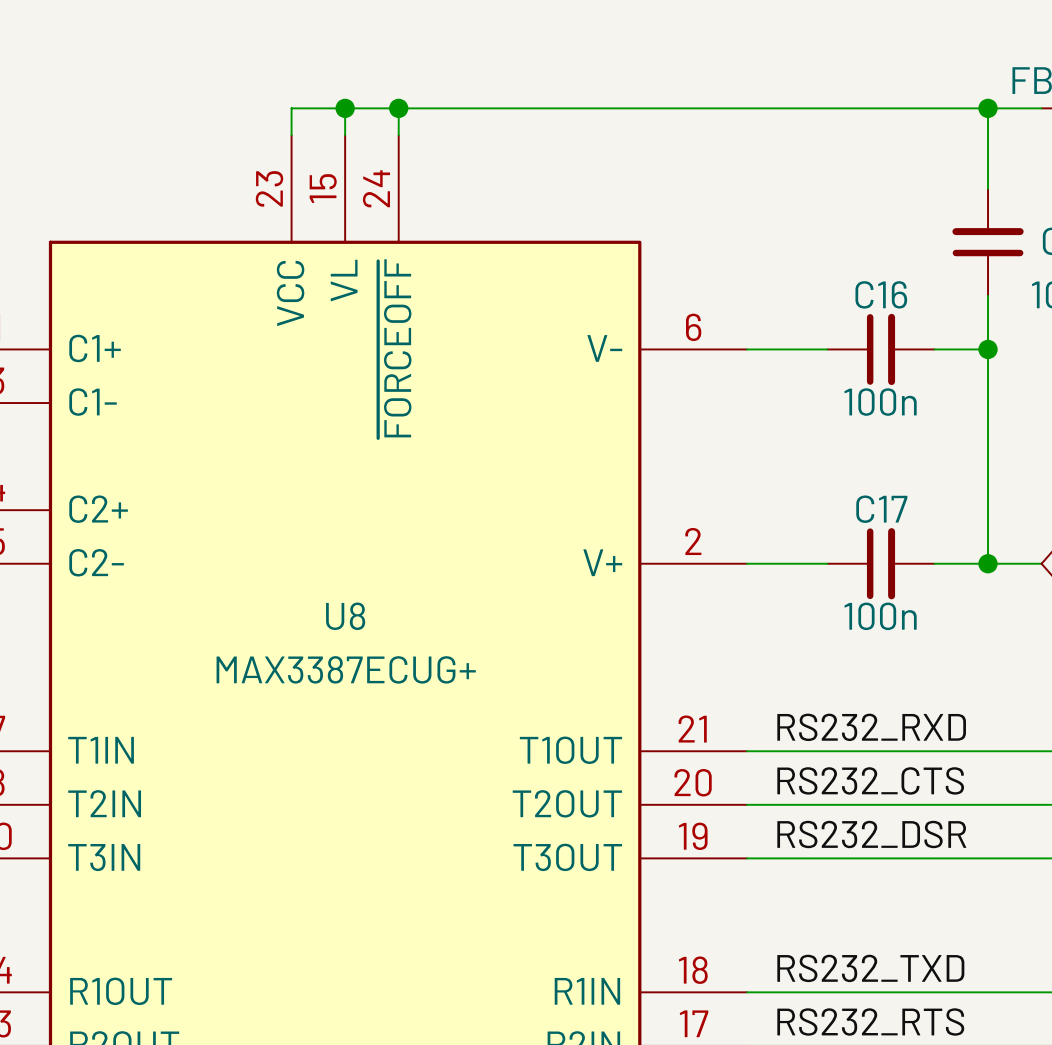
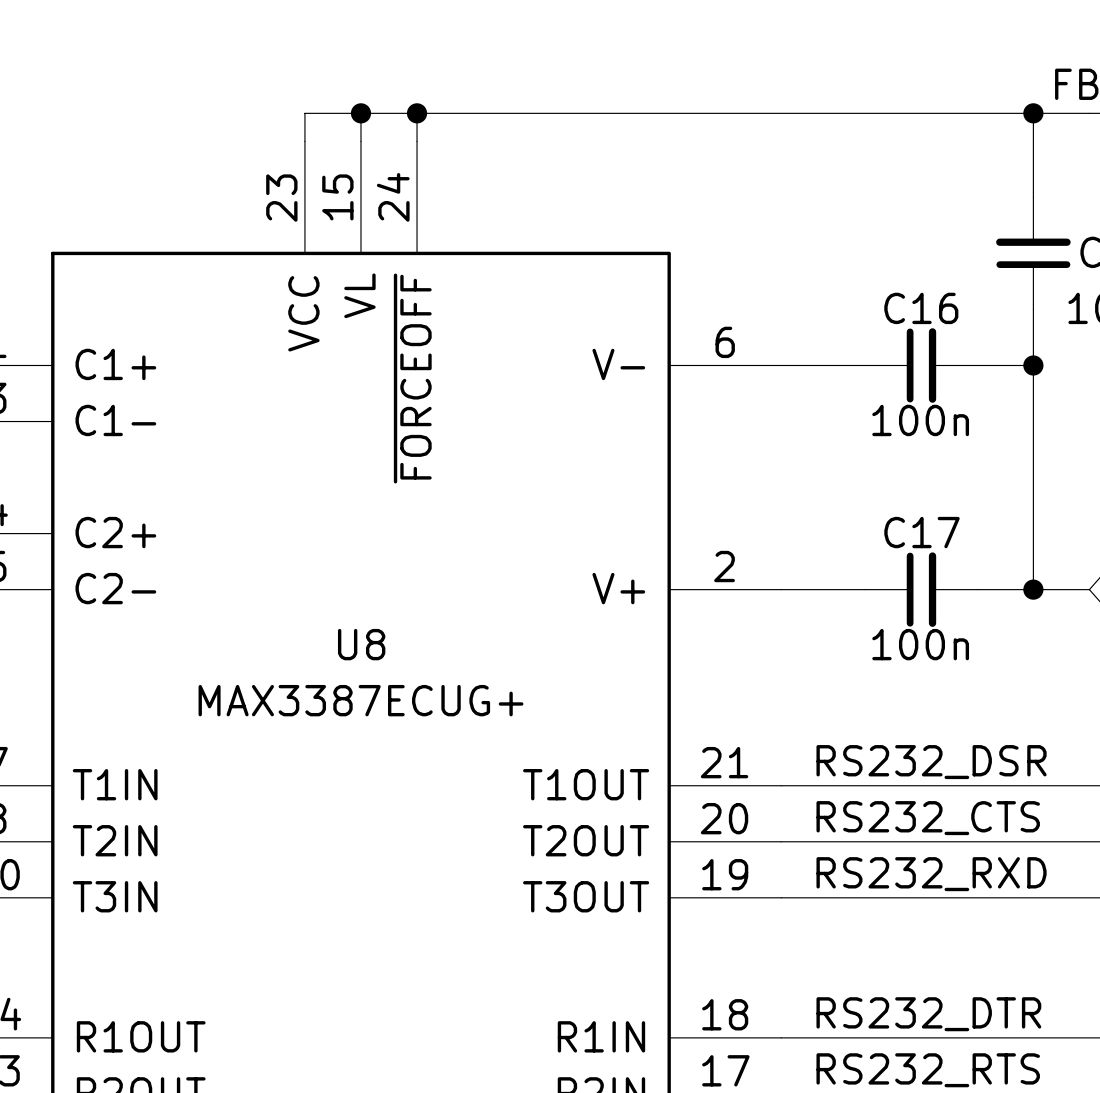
label: RS232_RXD (871, 727) -> RS232_DSR (931, 762)
label: RS232_DSR (871, 834) -> RS232_RXD (931, 874)
label: RS232_TXD (870, 968) -> RS232_DTR (928, 1014)

